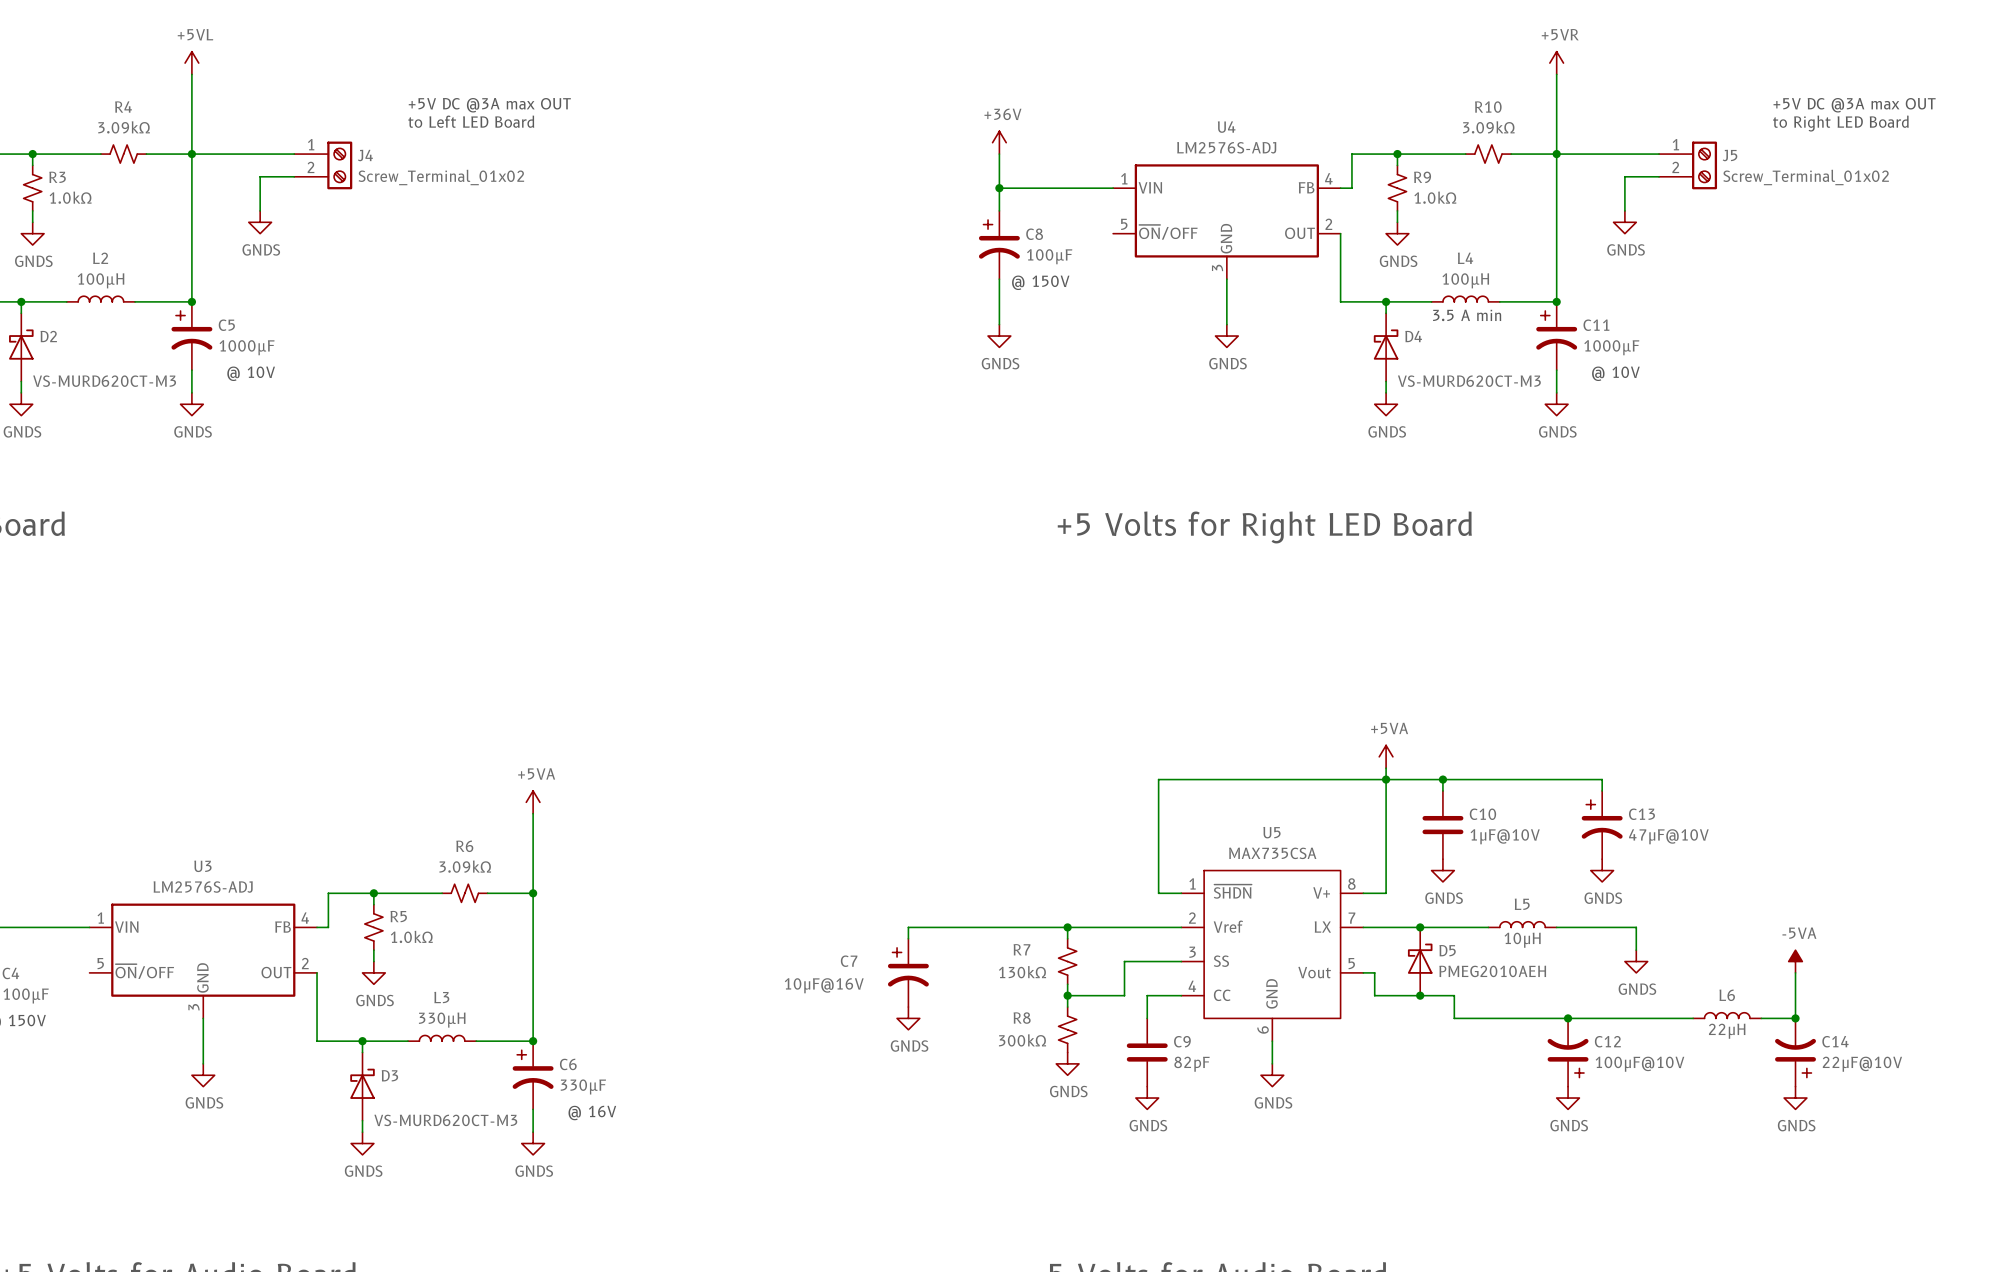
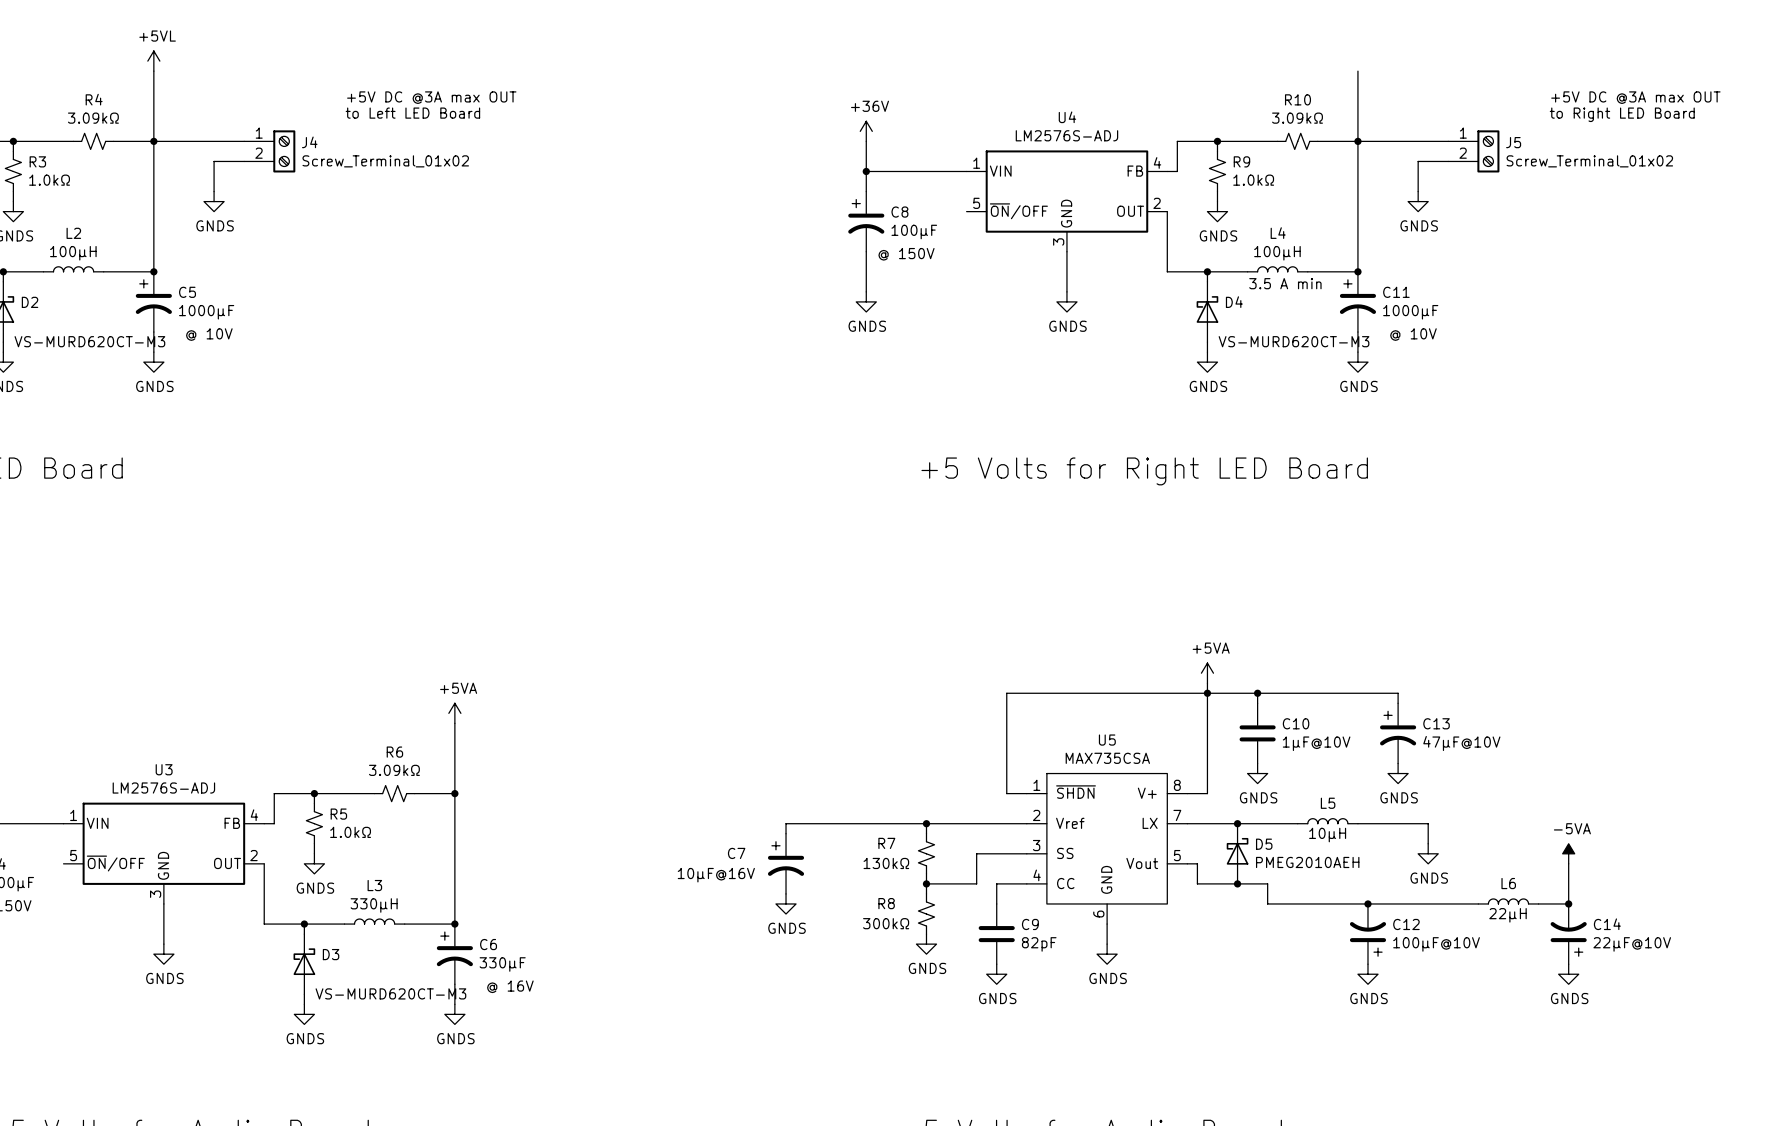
power symbol: +5VR (1556, 63) -> none

